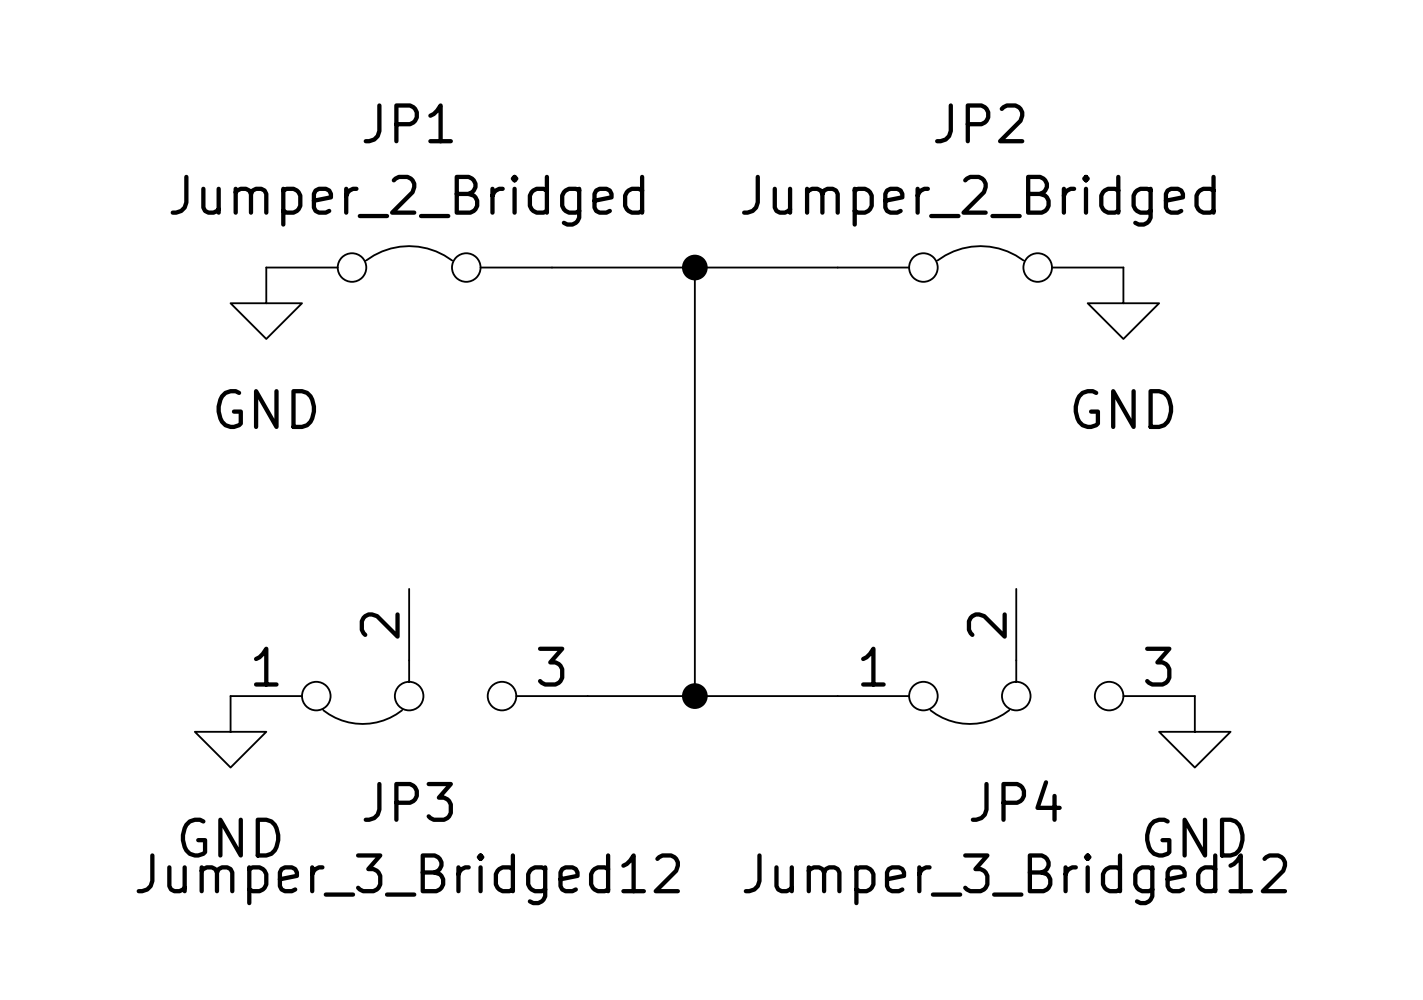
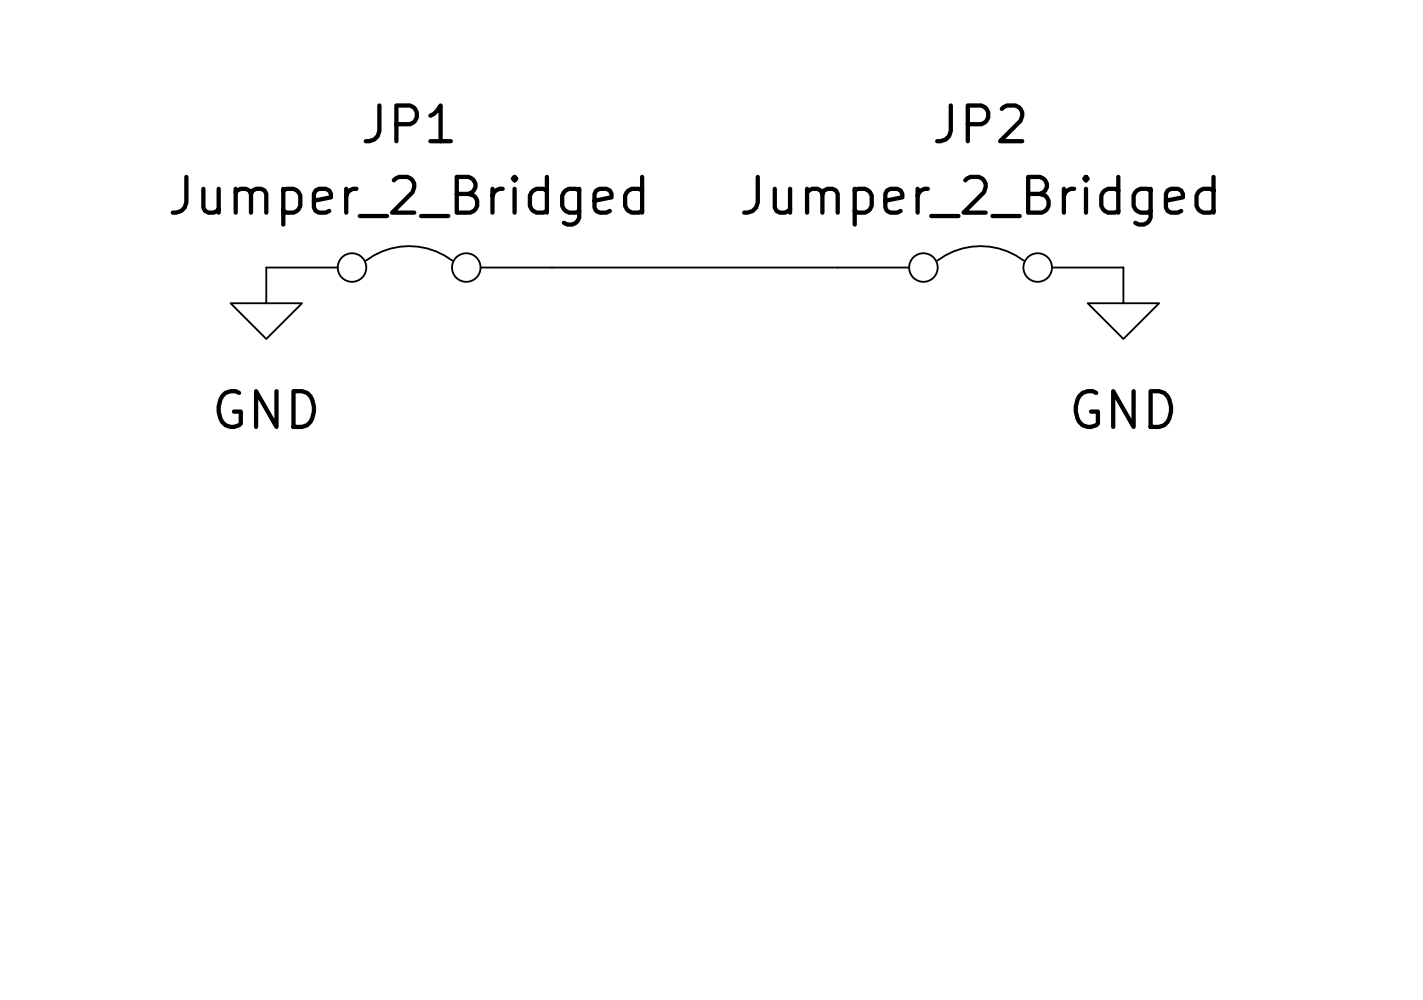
wire: (694, 267) (694, 696) -> none
junction: (694, 267) -> none
JP3: Jumper_3_Bridged12 (409, 656) -> none
JP4: Jumper_3_Bridged12 (1016, 656) -> none
wire: (587, 696) (837, 696) -> none
junction: (694, 696) -> none
power symbol: GND (230, 731) -> none
power symbol: GND (1194, 731) -> none

